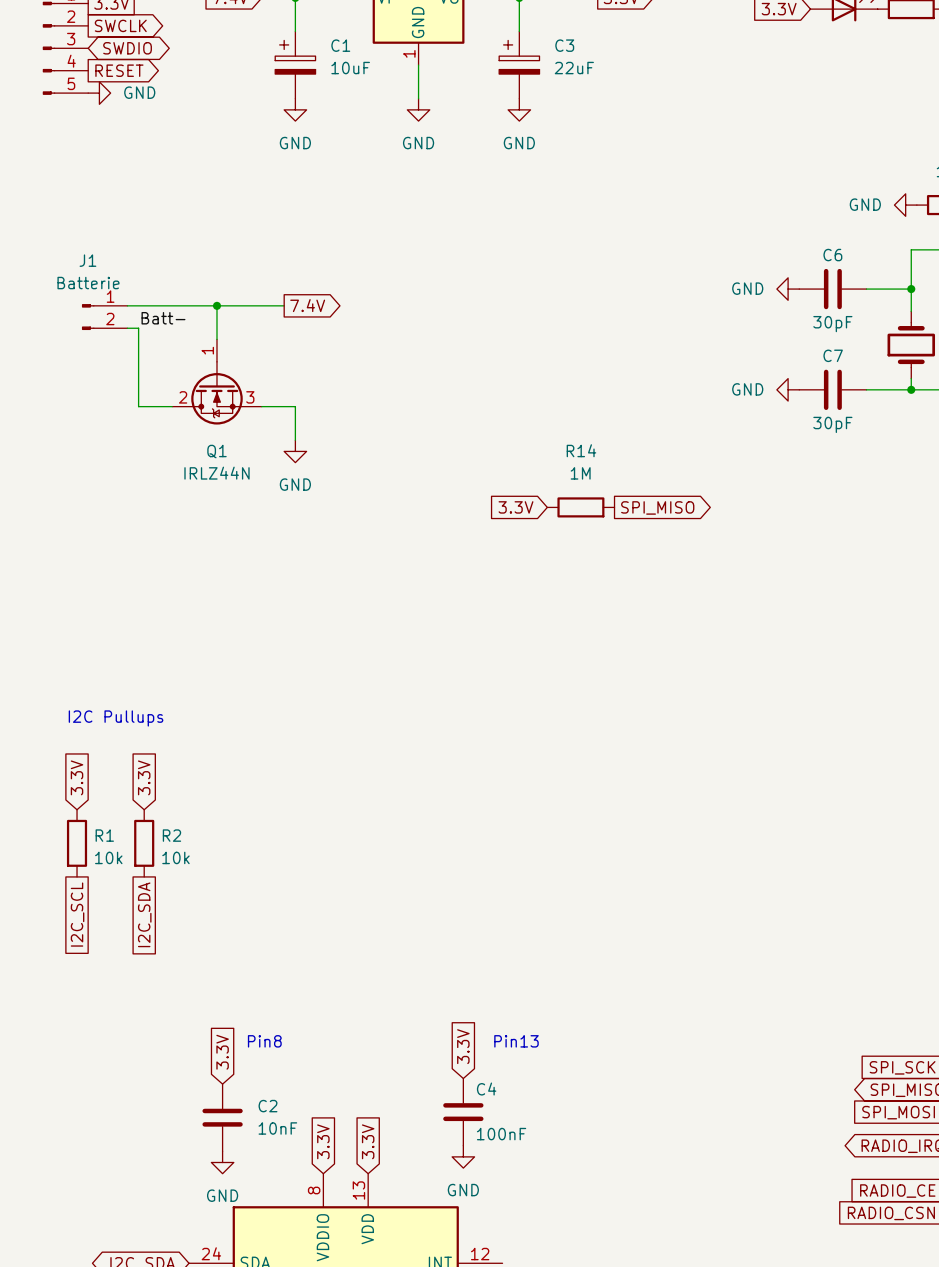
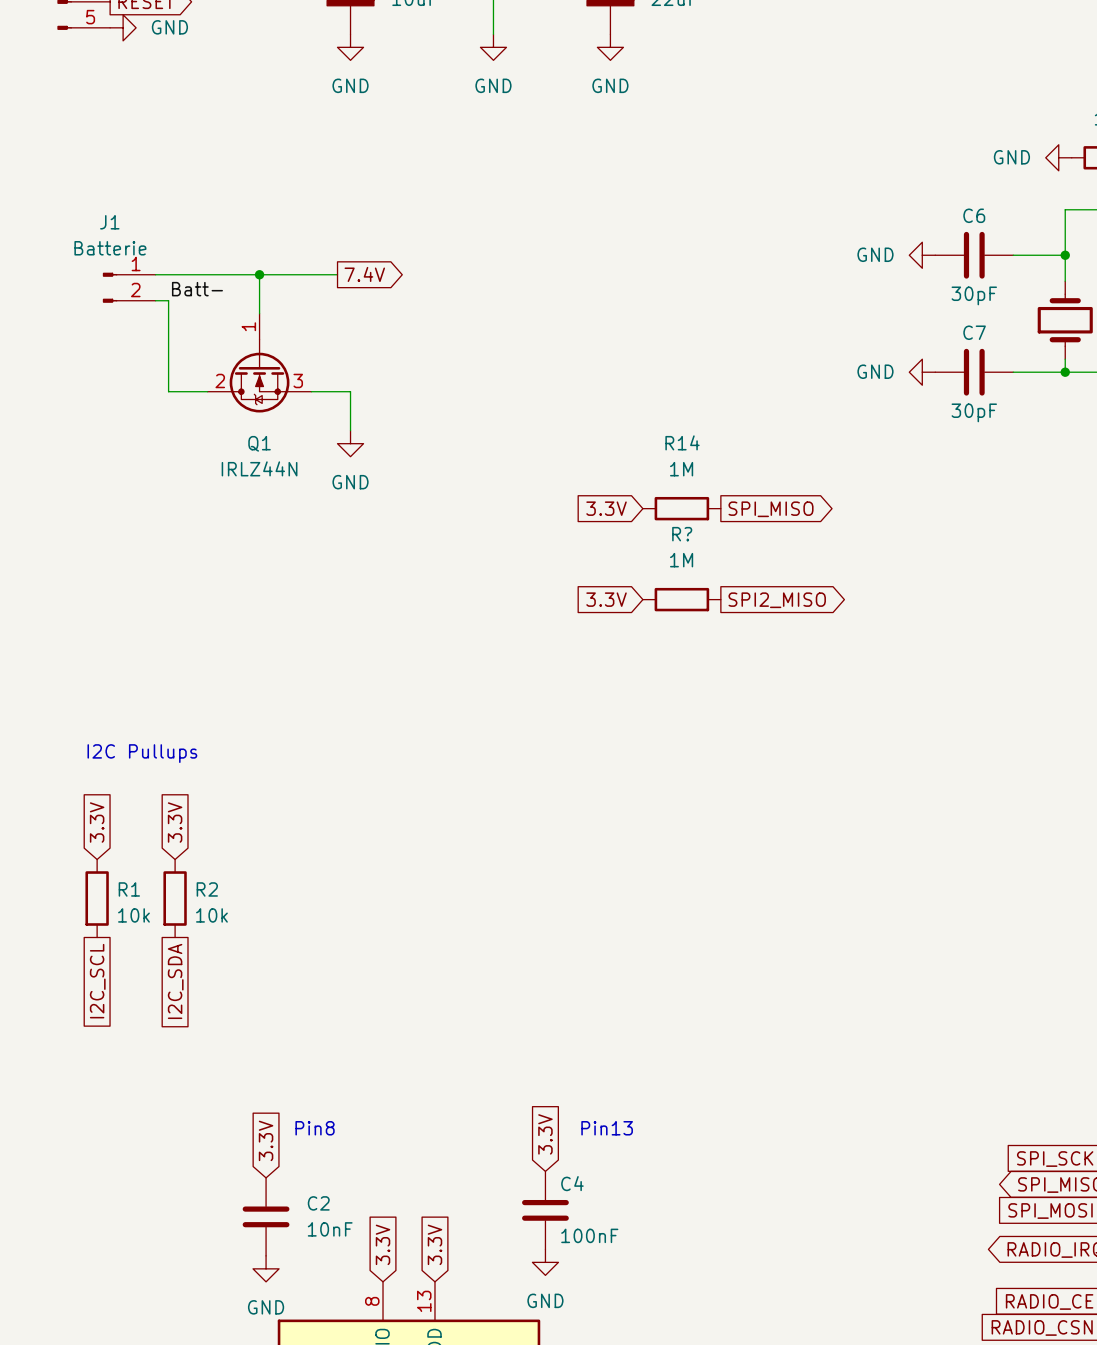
global label: none -> 3.3V (606, 599)
R?: none -> 1M (681, 599)
global label: none -> SPI2_MISO (777, 600)

